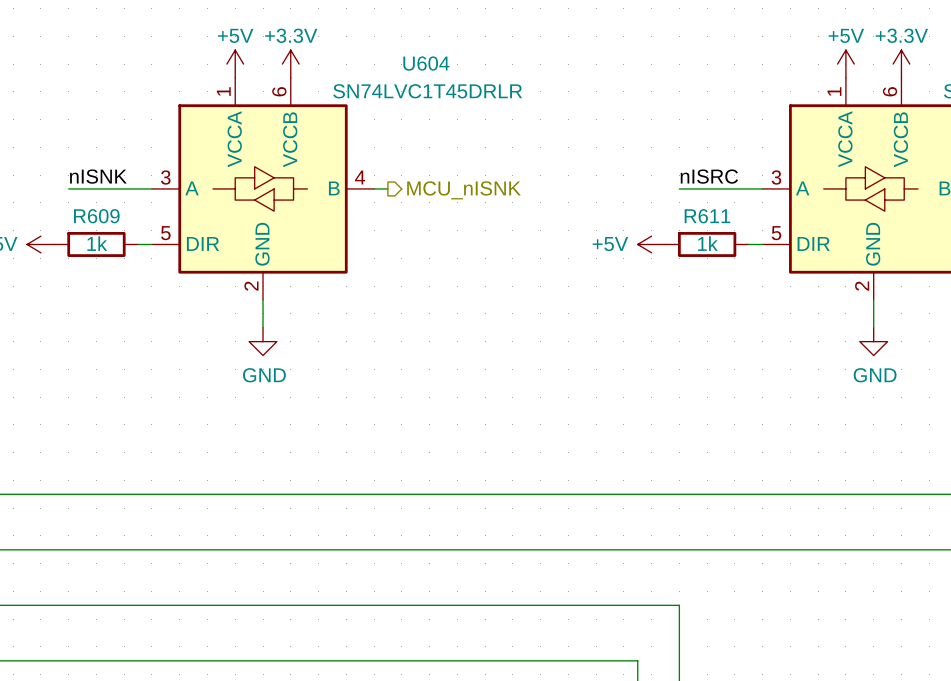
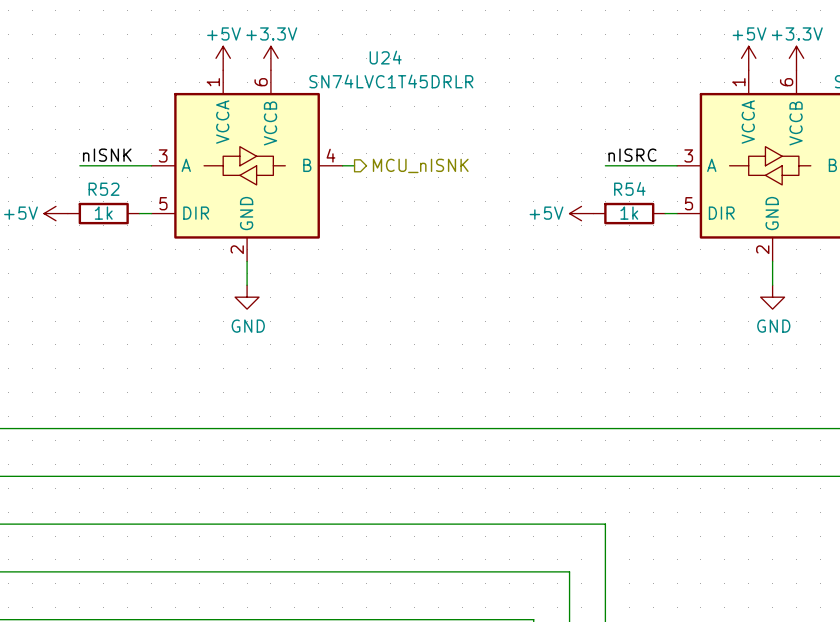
U604 name: U604 (426, 63) -> U24 (385, 57)
R609 name: R609 (96, 216) -> R52 (104, 189)
R611 name: R611 (707, 216) -> R54 (629, 188)

